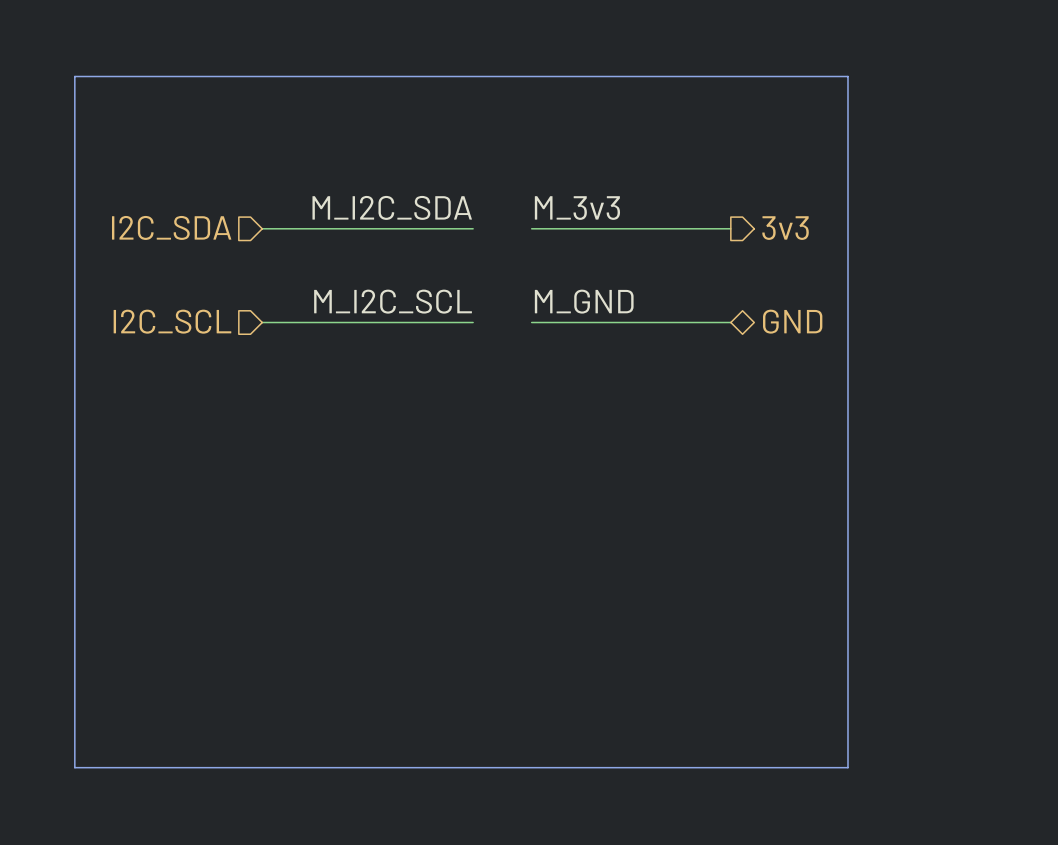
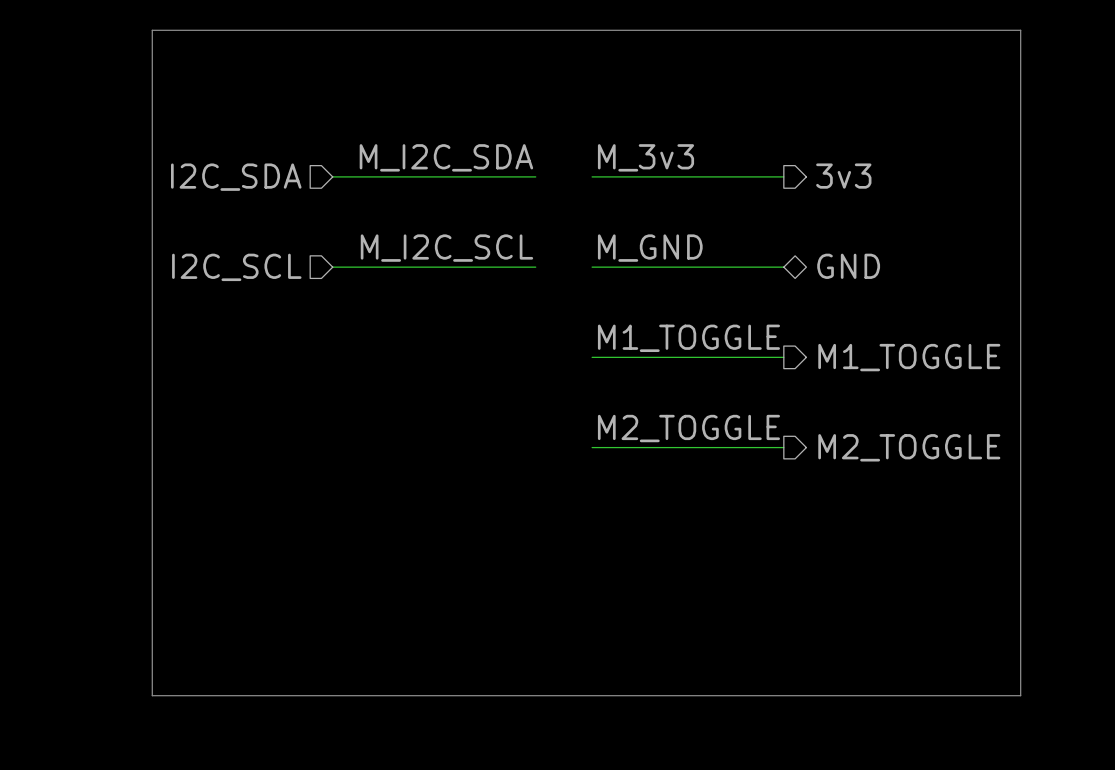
line: (847, 76) (847, 767) -> (896, 30) (1020, 30) (1020, 695) (896, 695)
label: none -> M1_TOGGLE (688, 338)
hierarchical label: none -> M1_TOGGLE (909, 357)
wire: none -> (592, 357) (783, 357)
label: none -> M2_TOGGLE (688, 428)
wire: none -> (592, 447) (783, 447)
hierarchical label: none -> M2_TOGGLE (909, 447)

